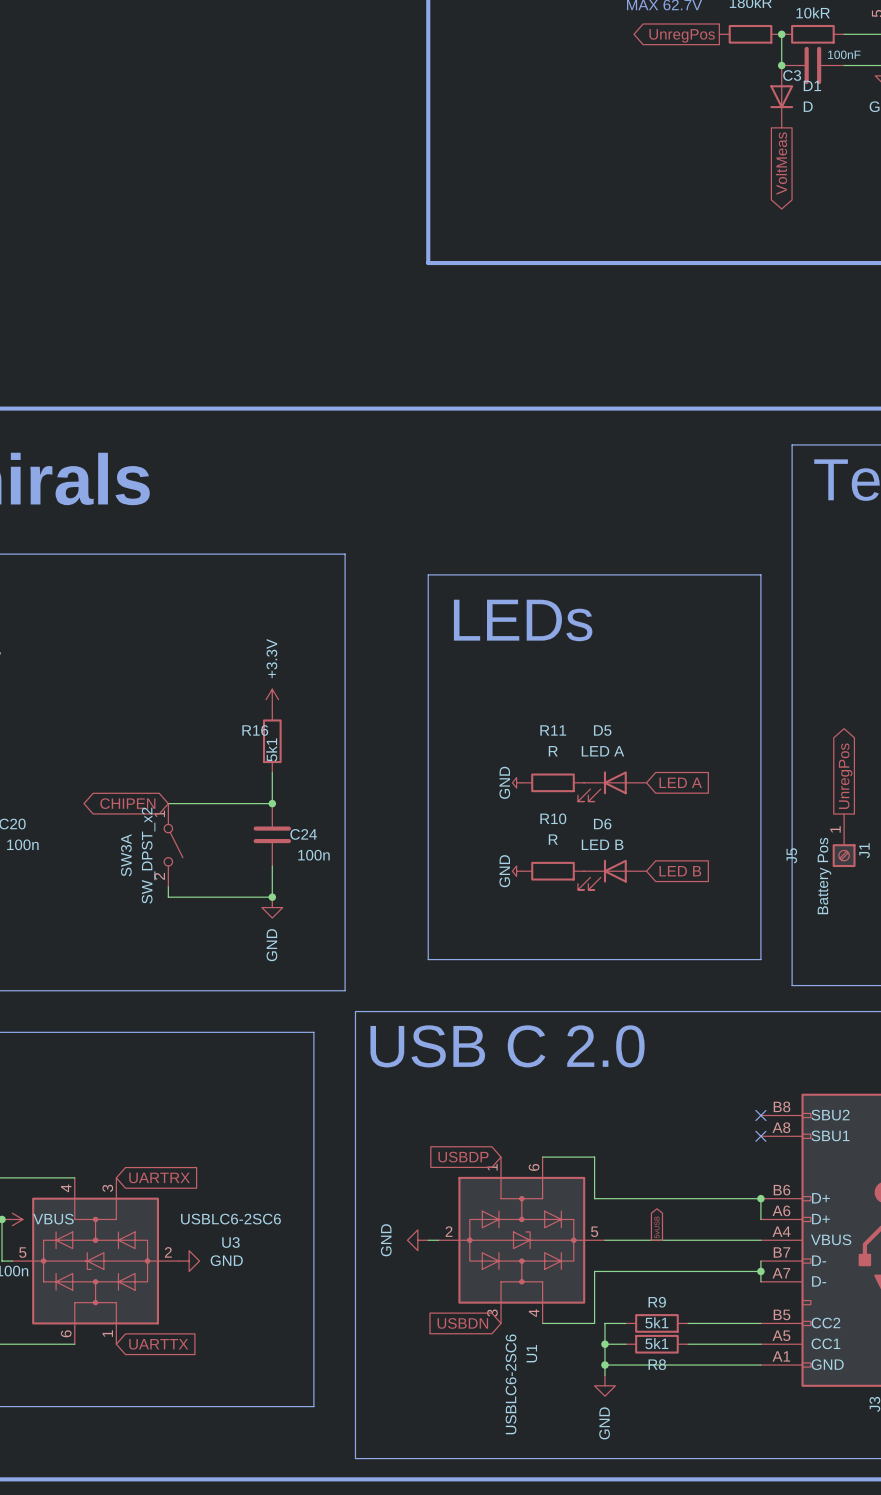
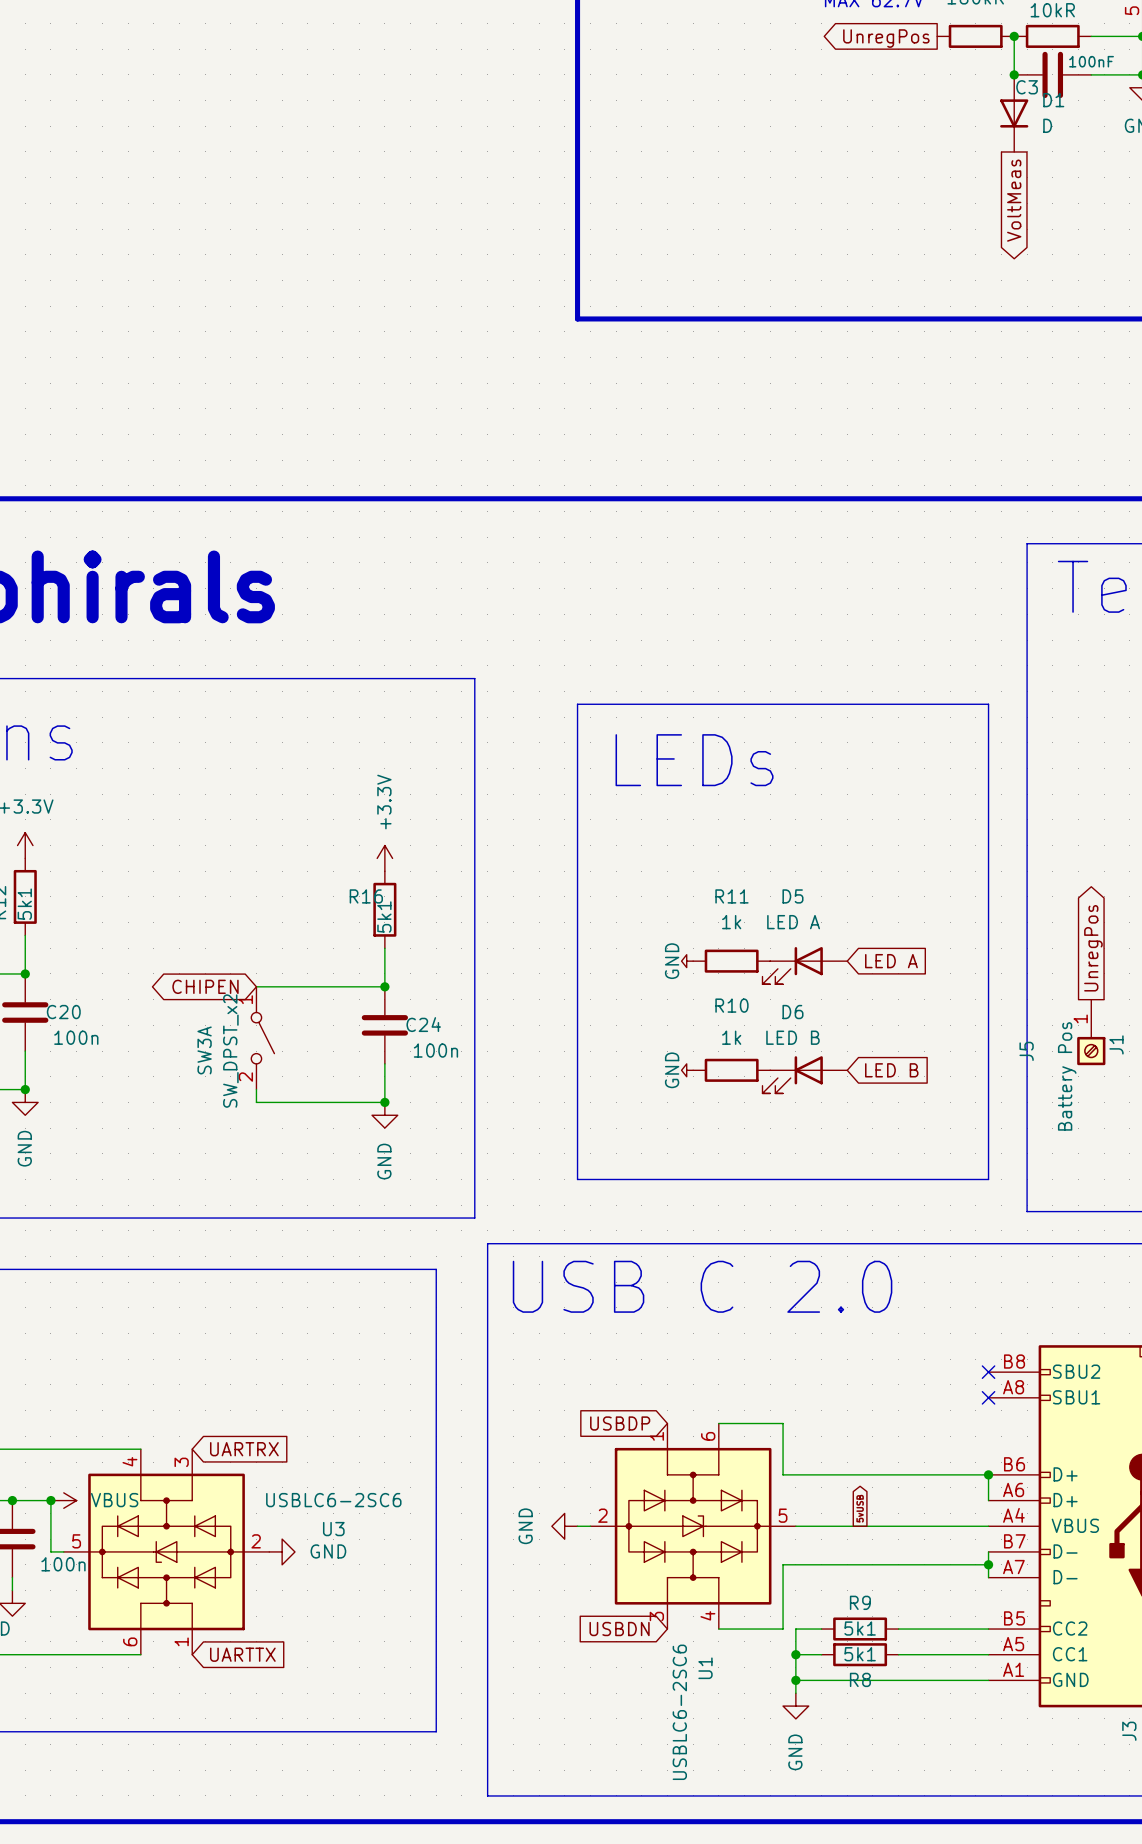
R11 value: R (553, 751) -> 1k (731, 922)
R10 value: R (553, 839) -> 1k (731, 1037)

